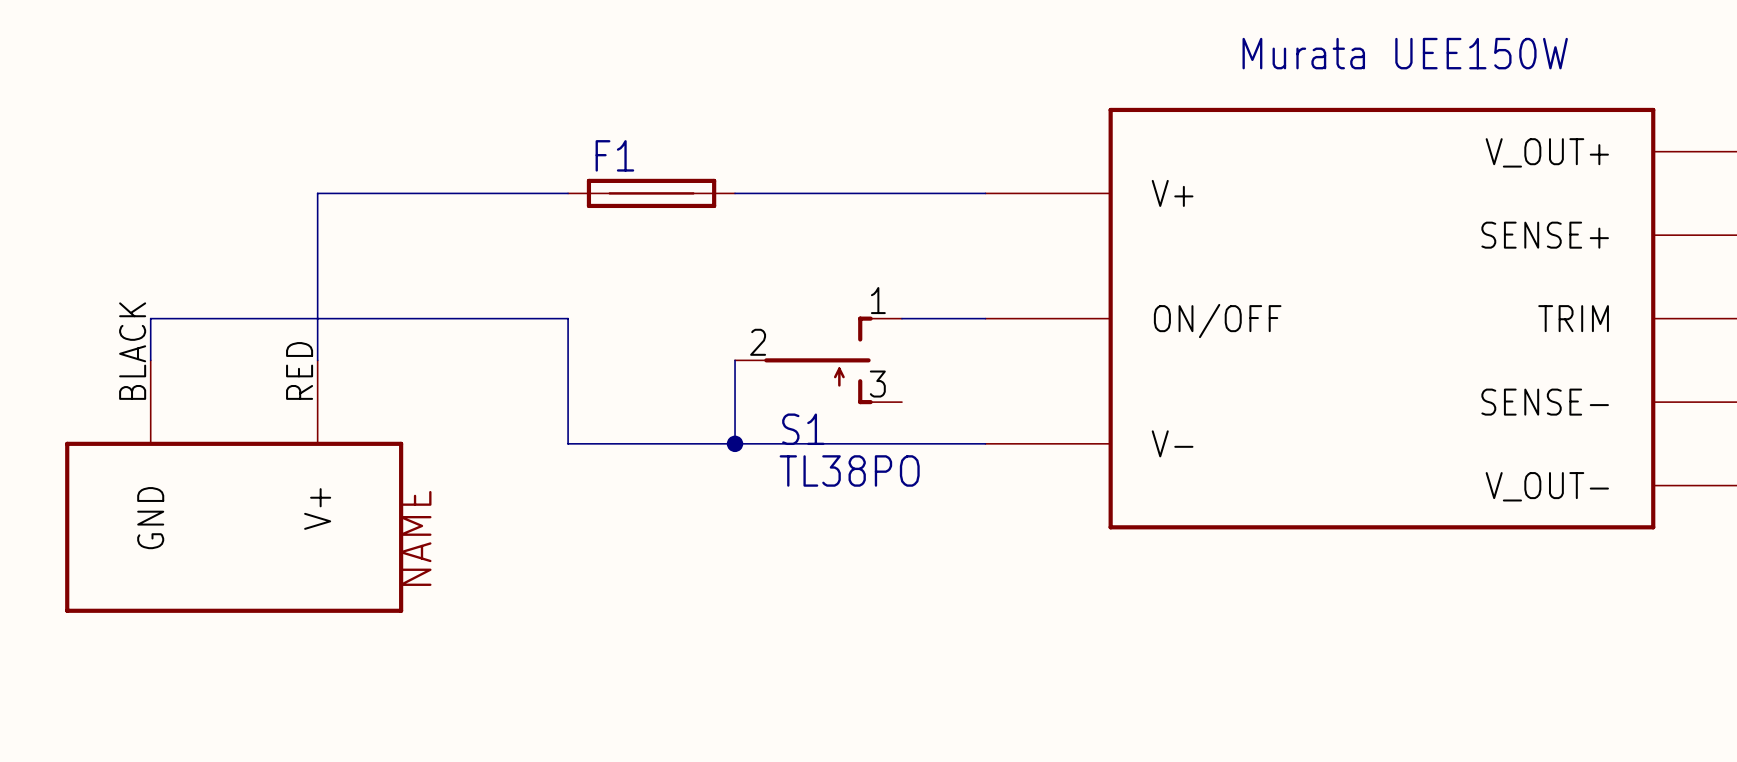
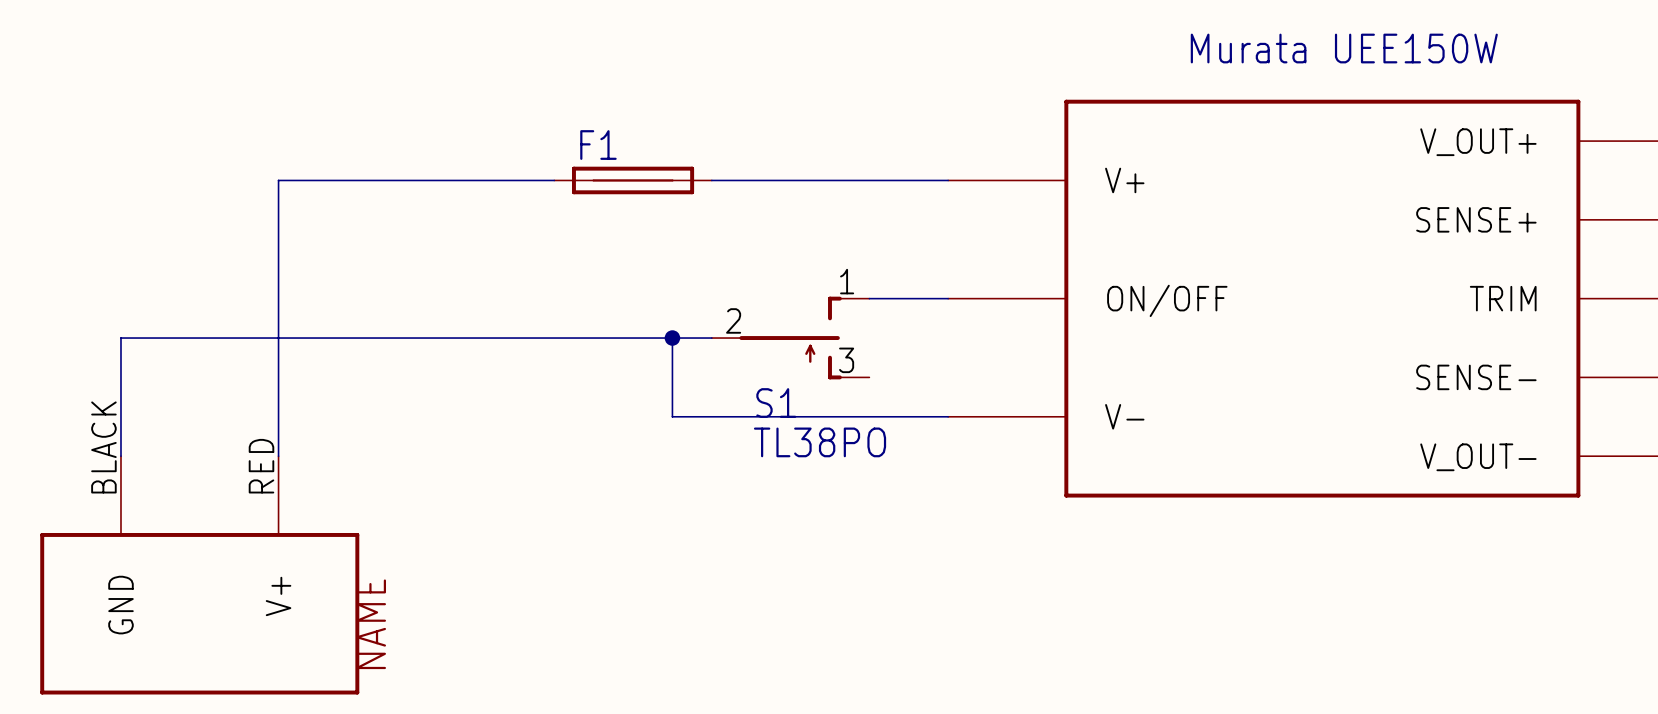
wire: (317, 193) (317, 360) -> (317, 180) (278, 180) (278, 456)
wire: (150, 360) (150, 318) (568, 318) (568, 443) (693, 443) -> (672, 338) (672, 416)
wire: (735, 360) (735, 443) -> (711, 338) (120, 338) (120, 456)
junction position: (735, 443) -> (672, 338)
part position: (234, 486) -> (199, 575)

